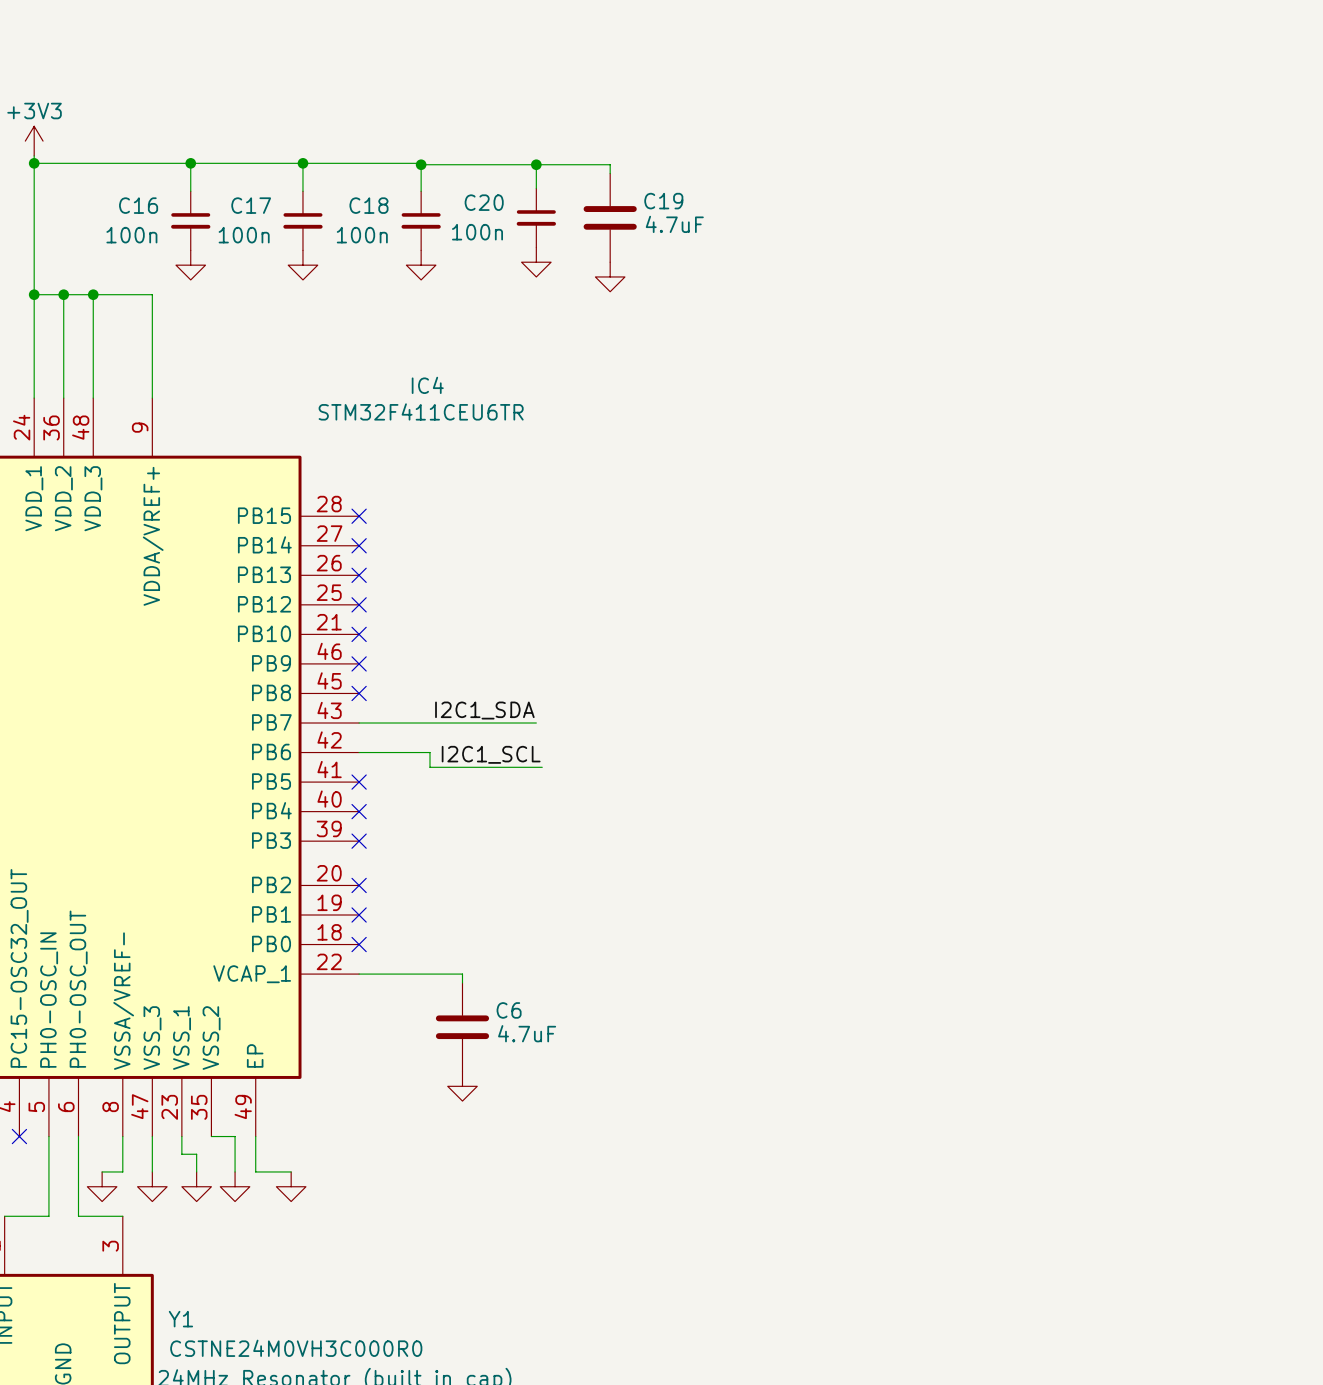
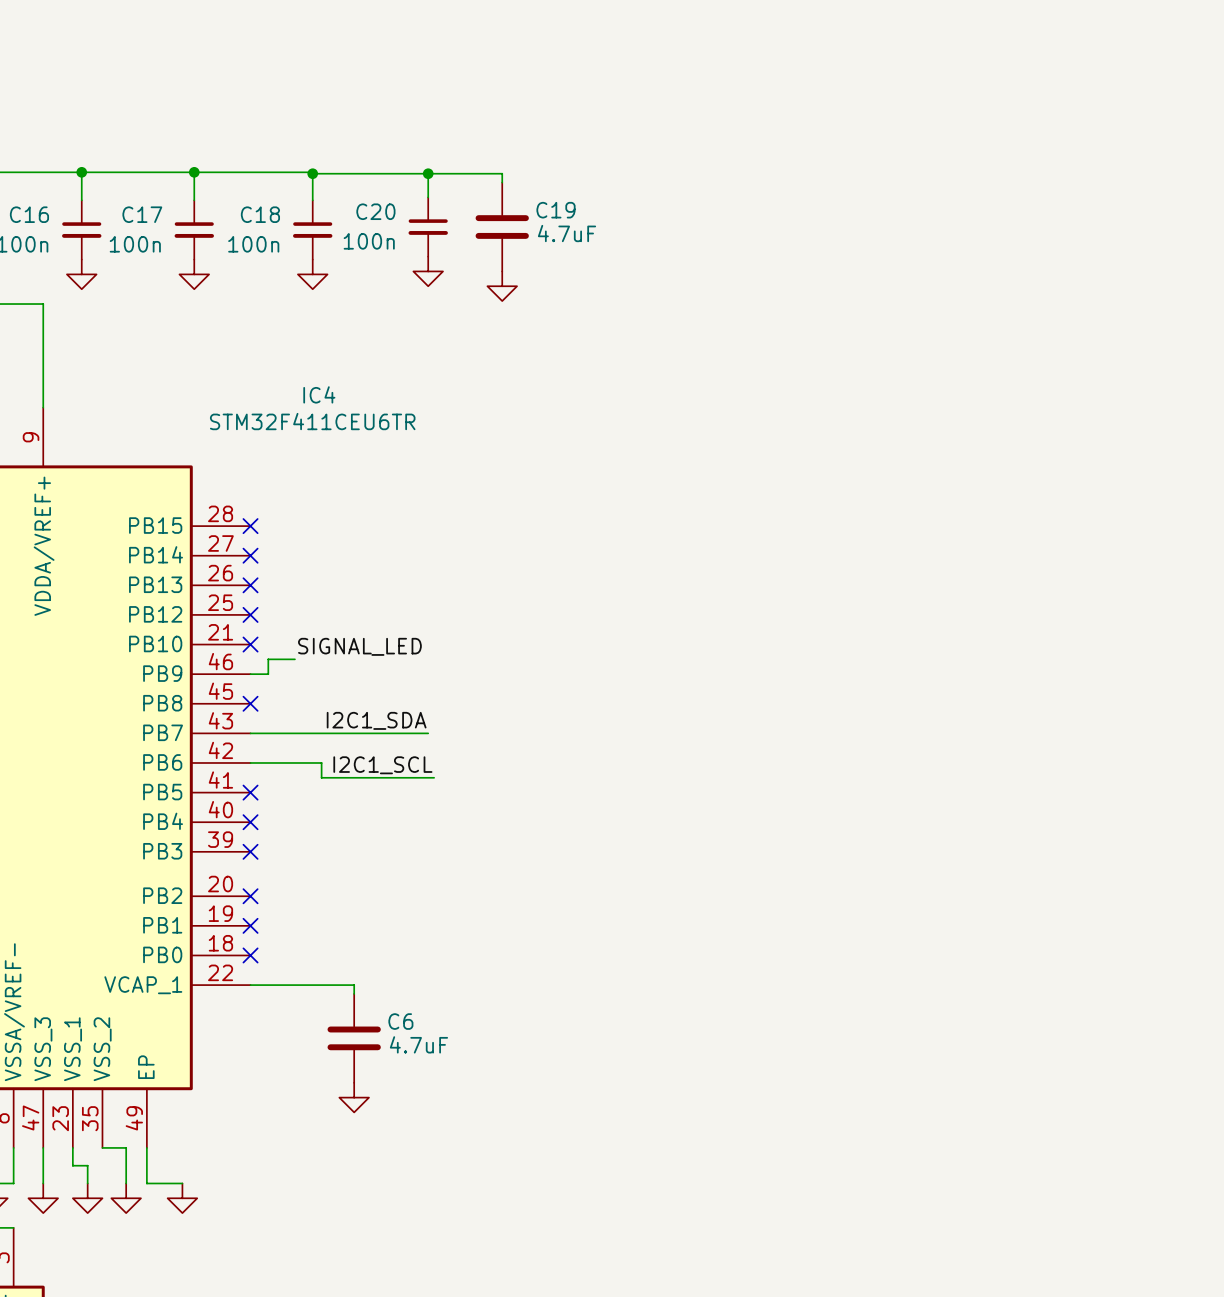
label: none -> SIGNAL_LED (359, 646)
wire: none -> (294, 659) (268, 659) (268, 674) (250, 674)
no-connect mark: (359, 663) -> none

